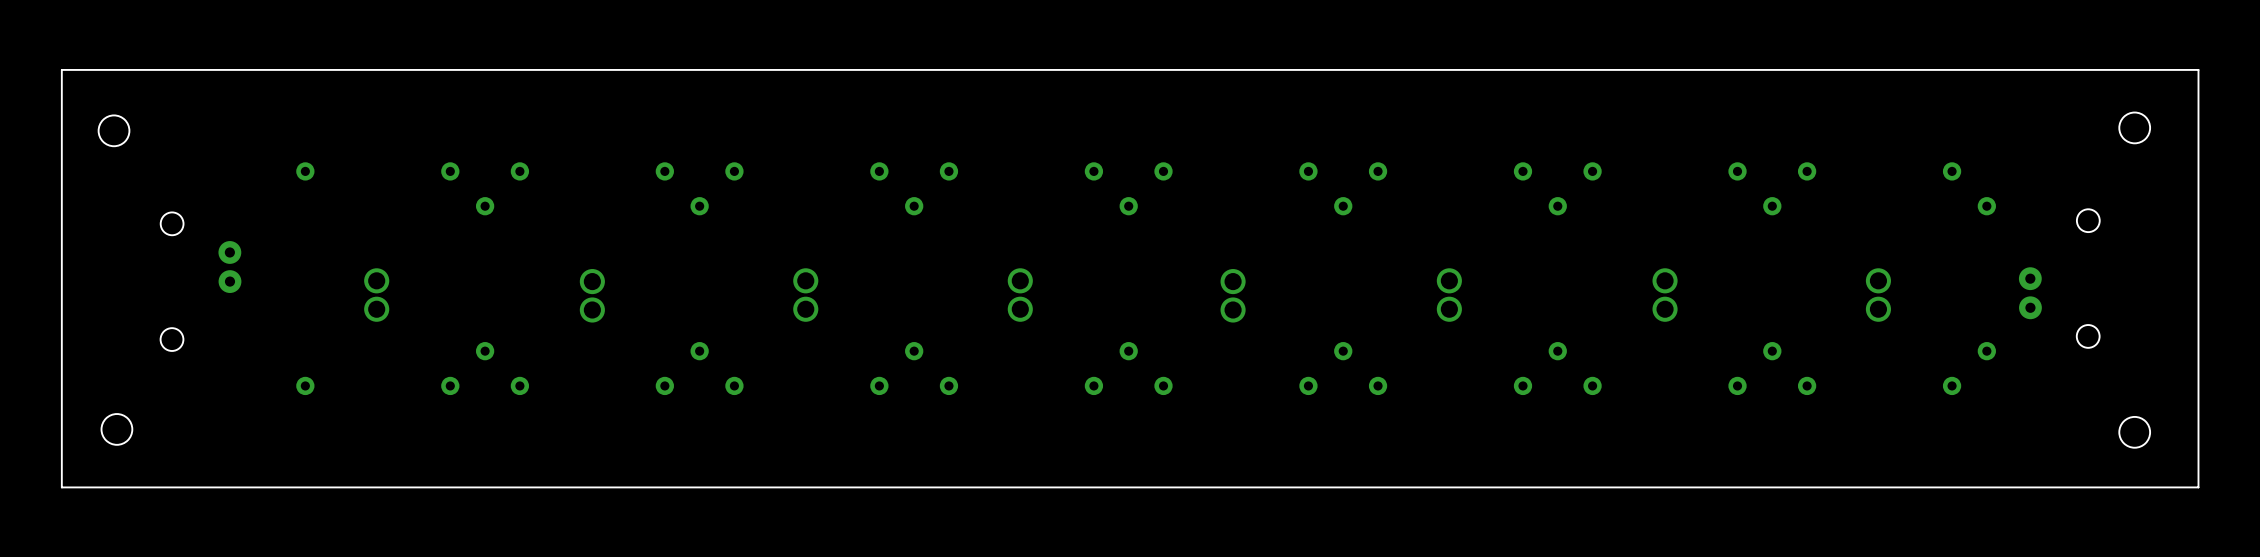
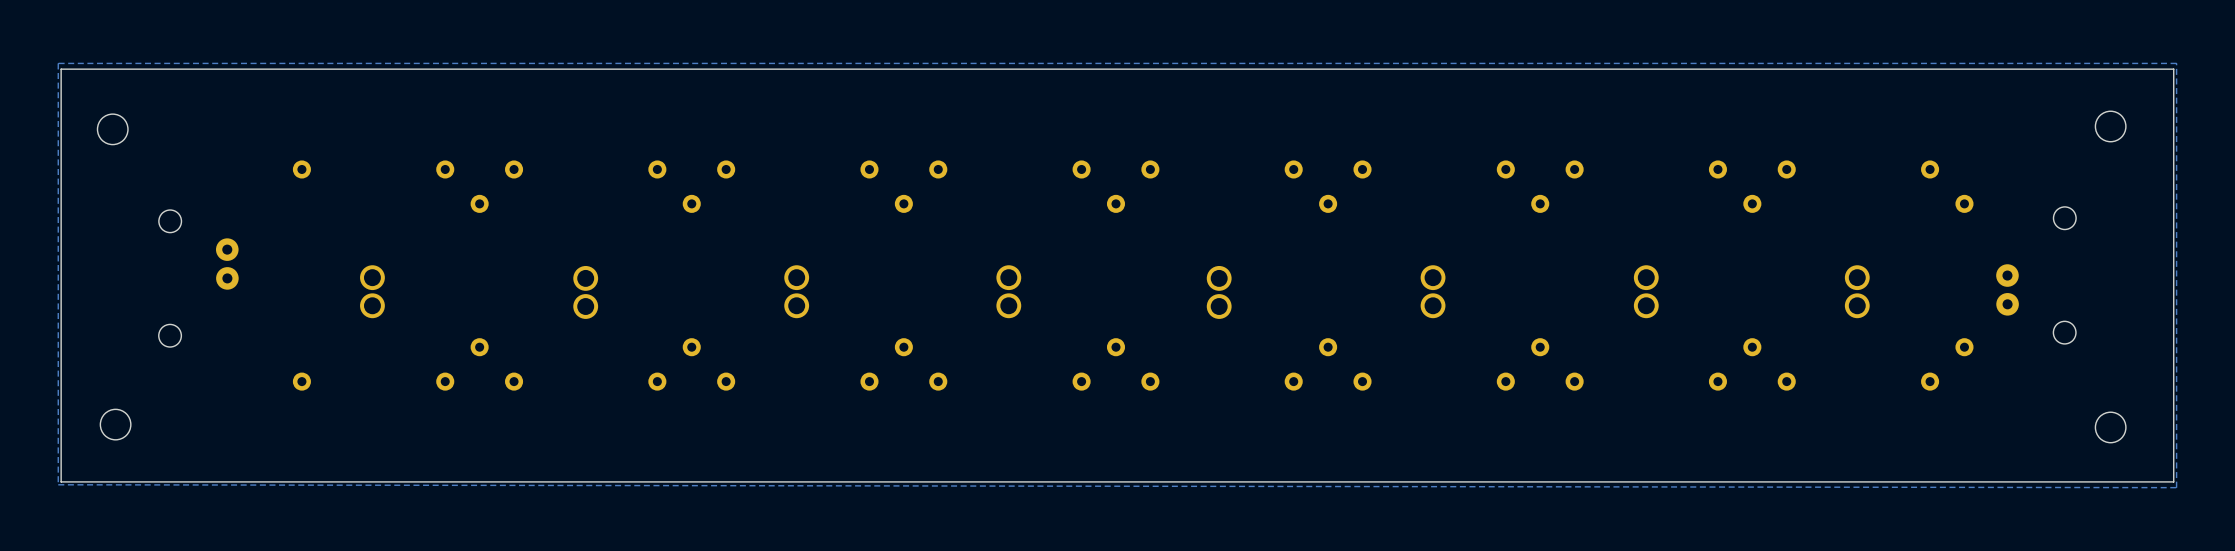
zone outline: none -> (2176, 63) (2176, 487) (58, 484) (58, 63) (2176, 63)

